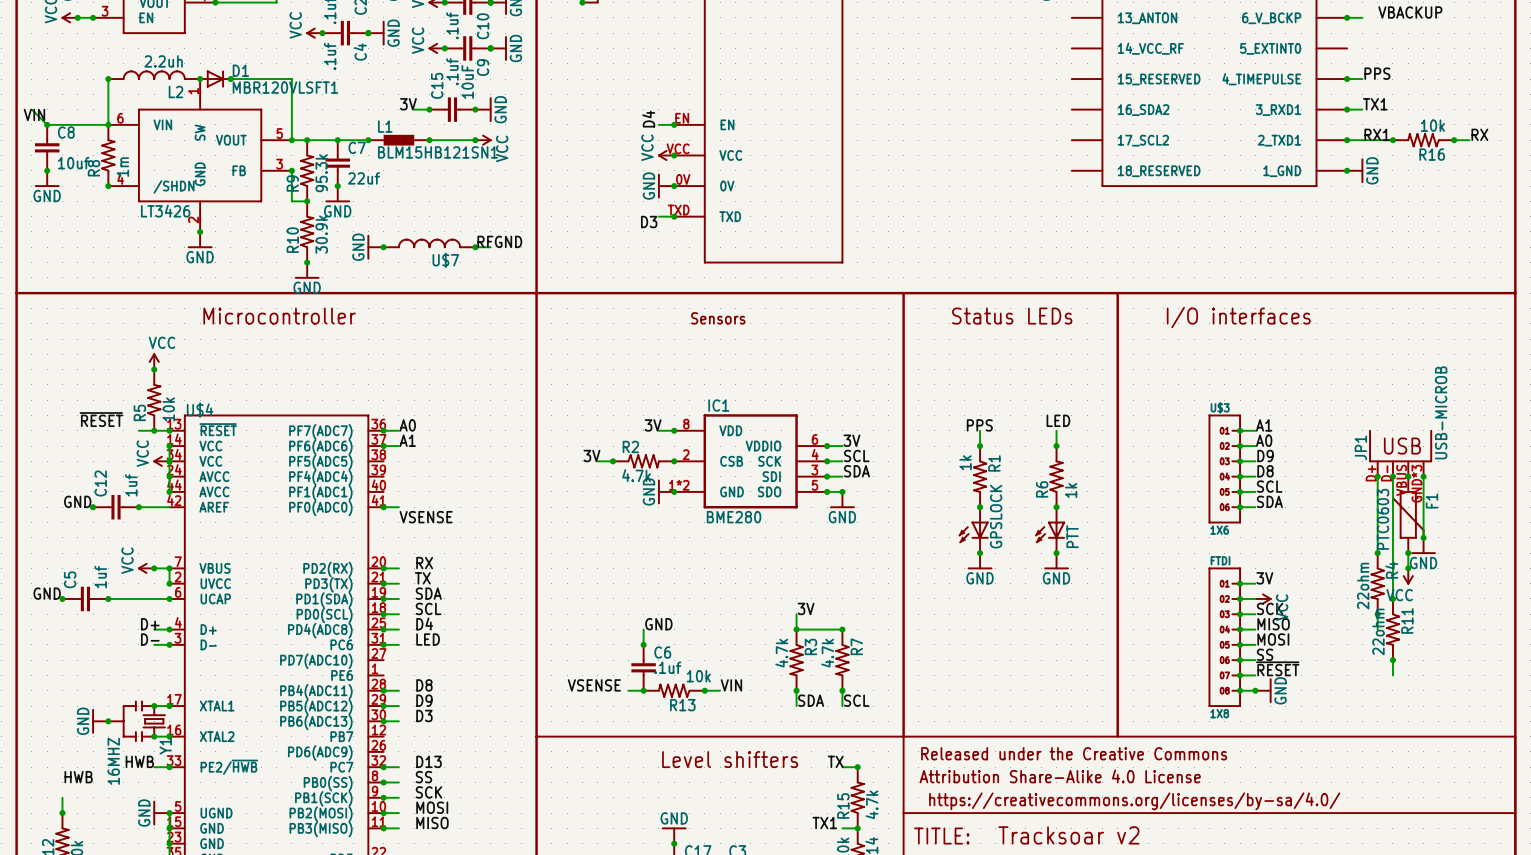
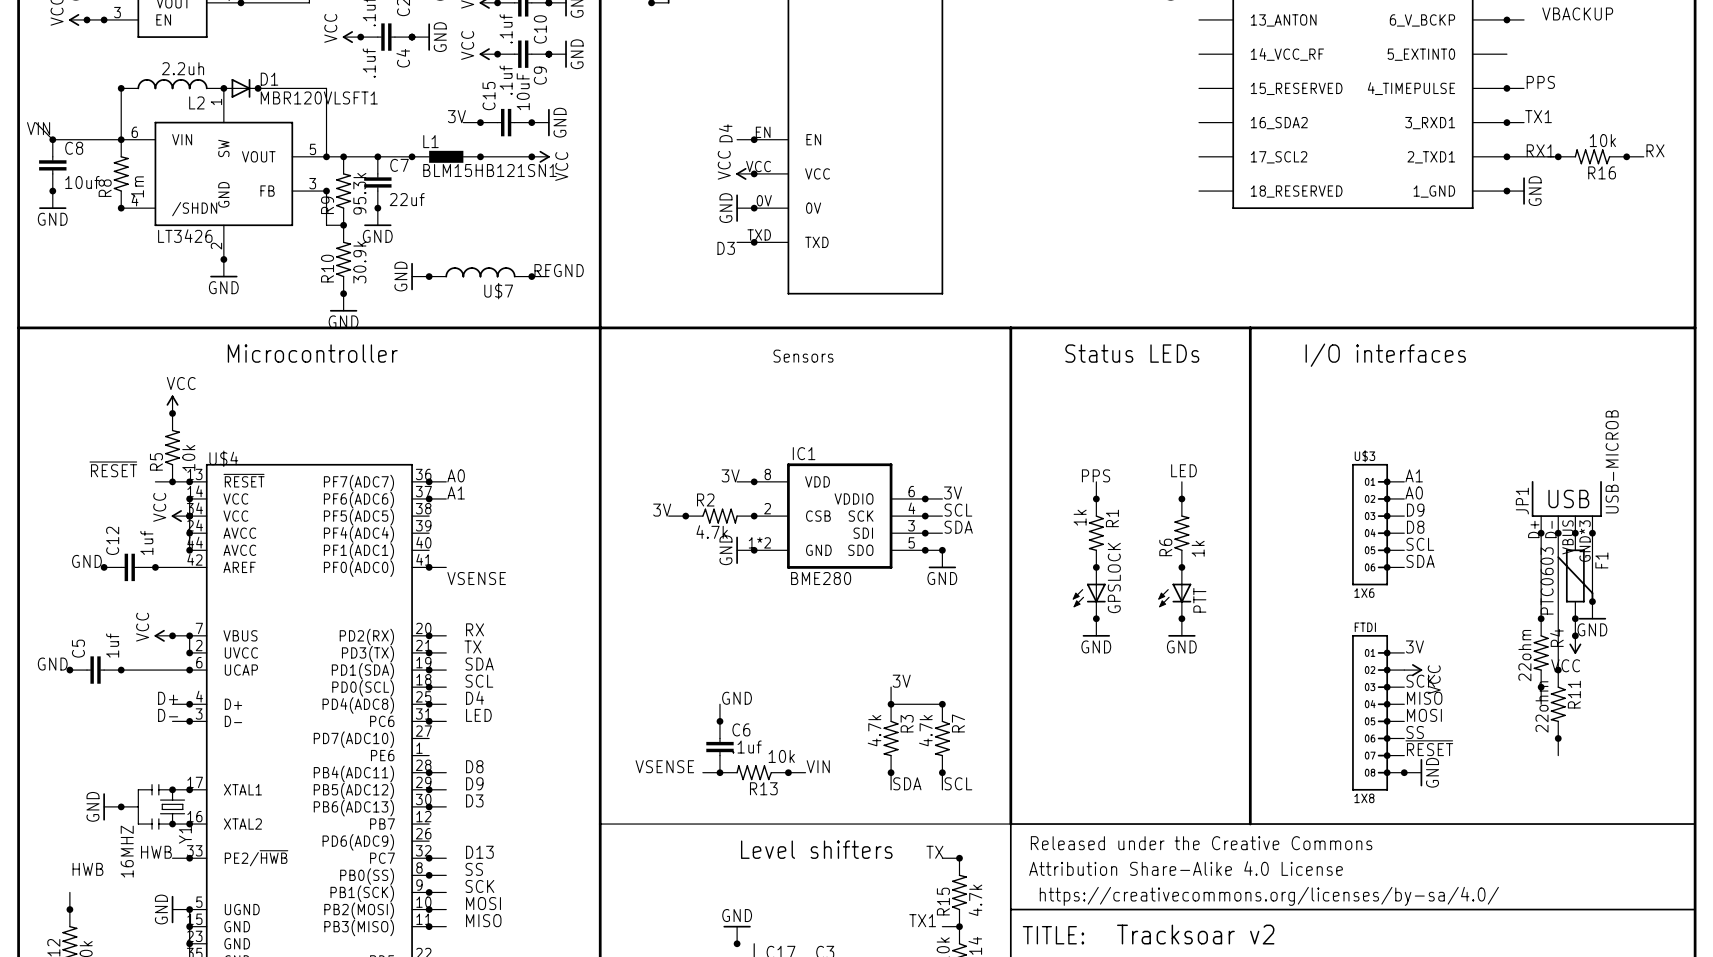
power symbol position: GND (674, 835) -> GND (737, 934)
junction position: (674, 843) -> (737, 943)

